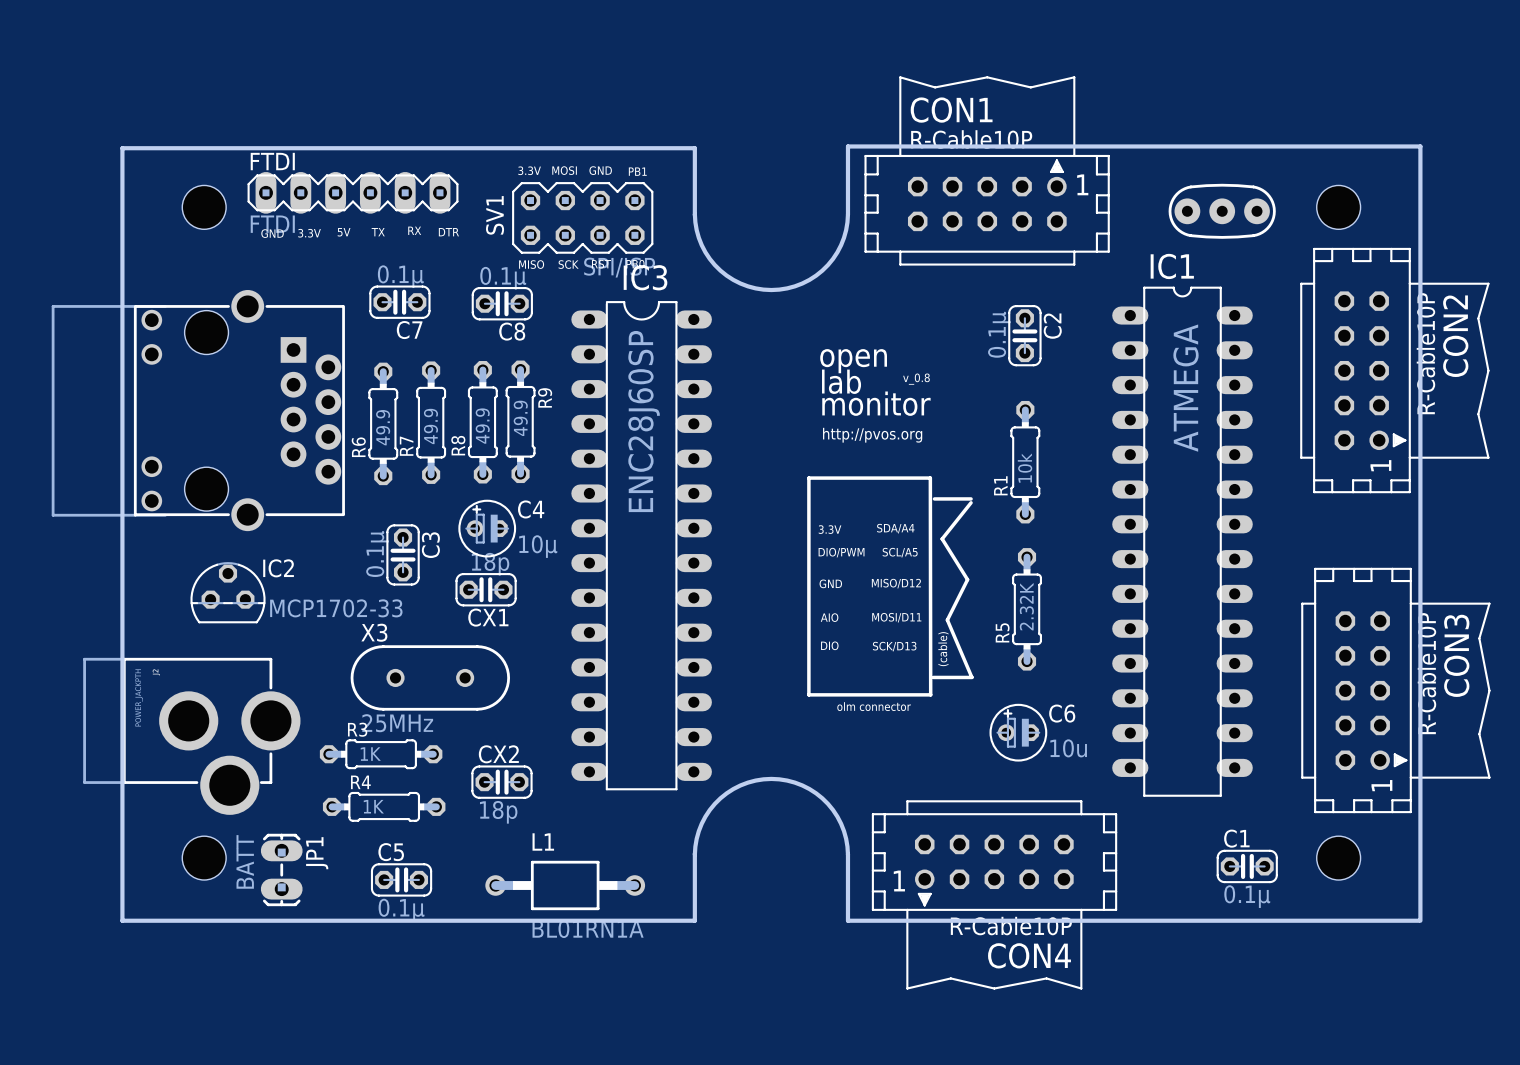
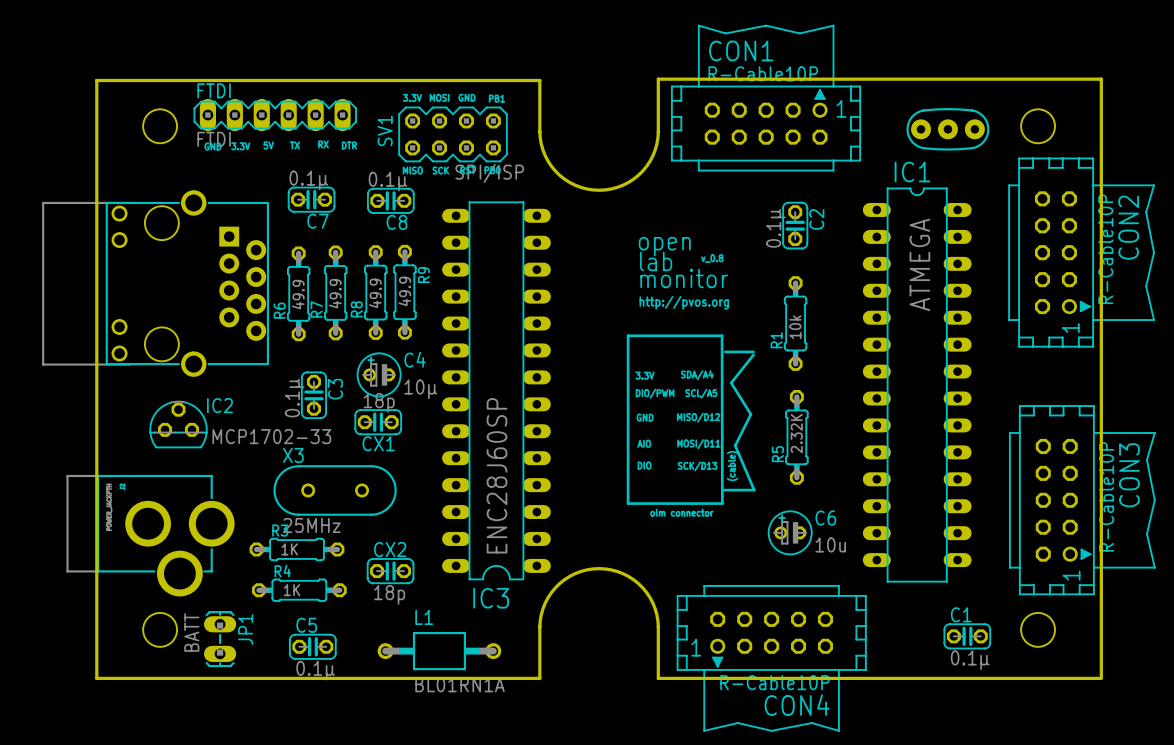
IC3 rotation: 0° (641, 545) -> 180° (496, 390)

